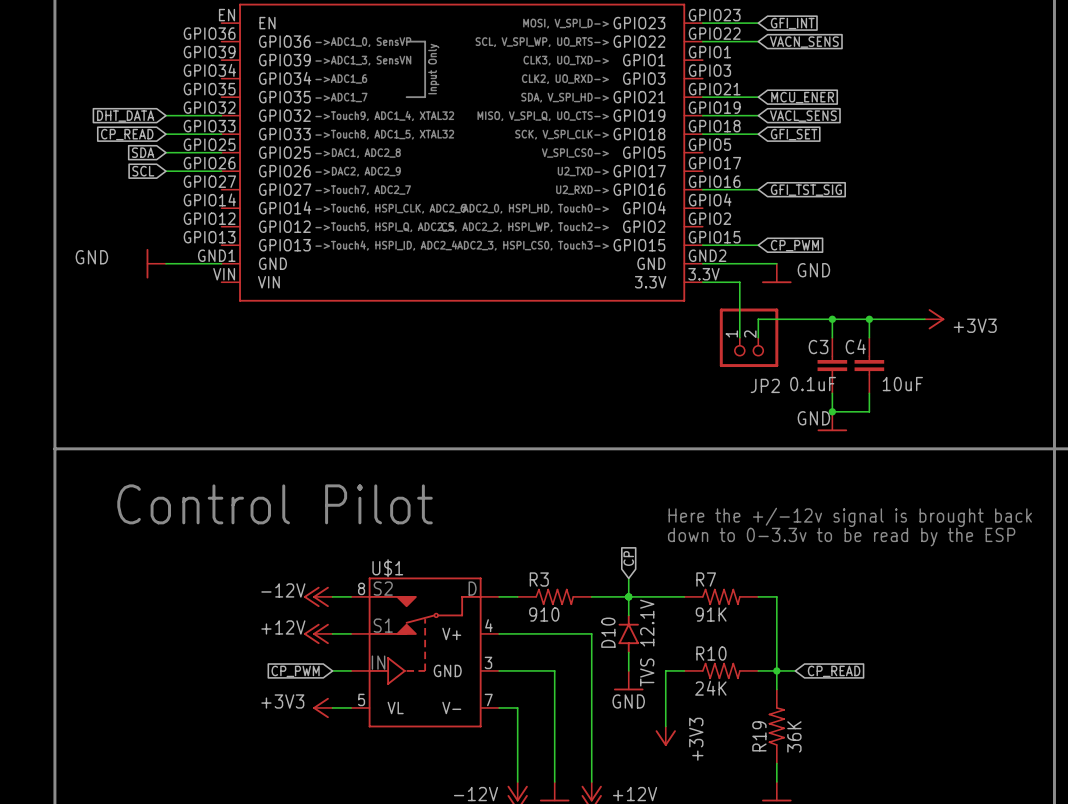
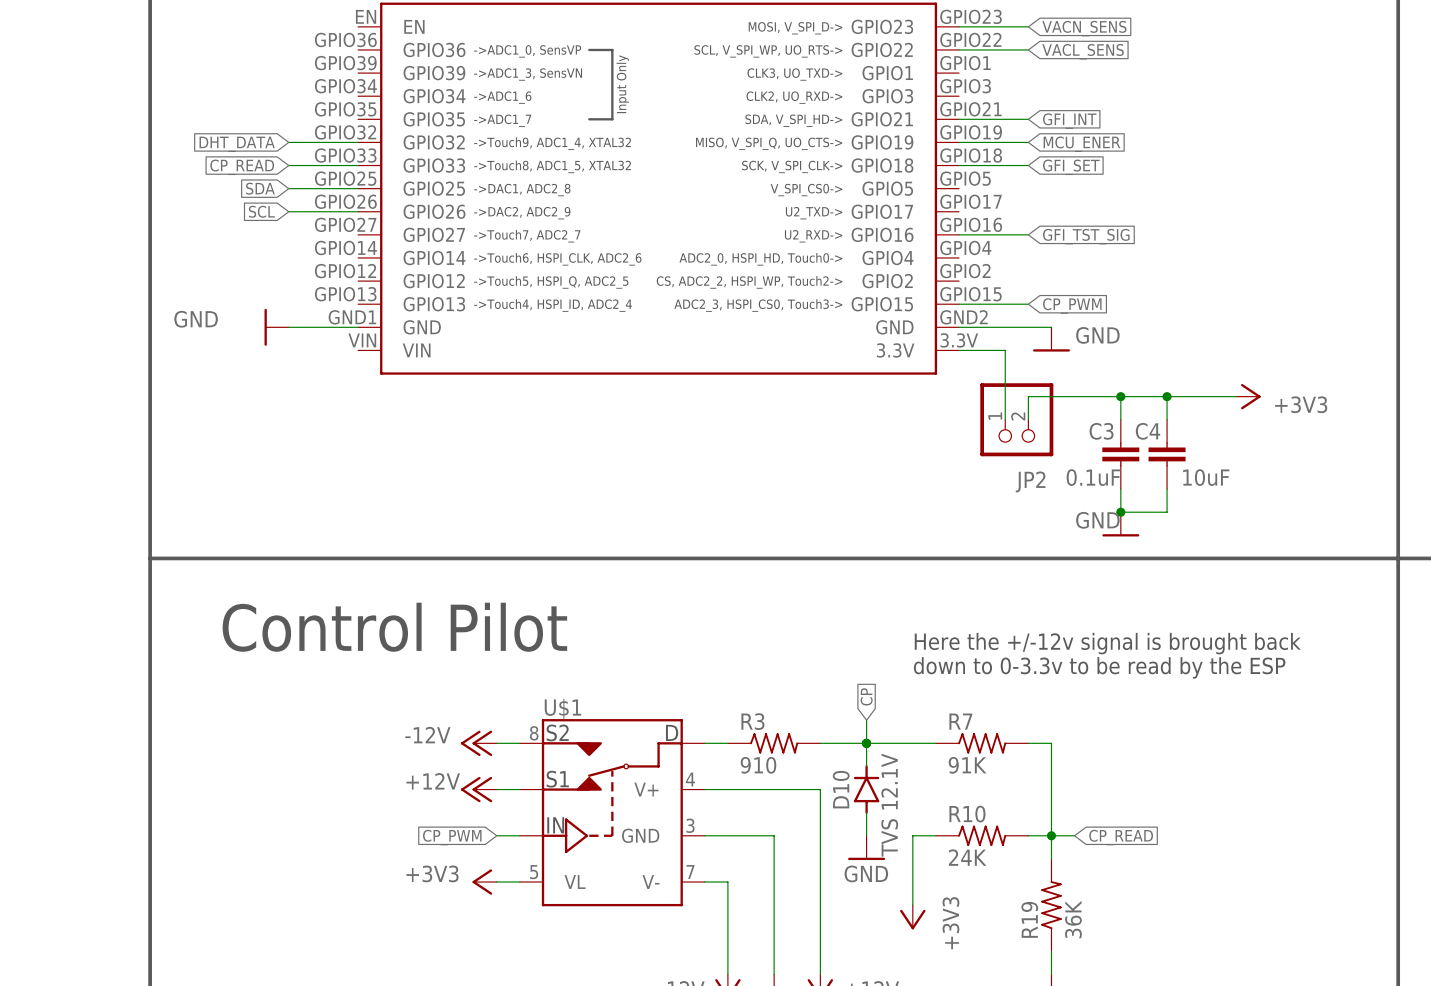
global label: GFI_INT (792, 23) -> VACN_SENS (1084, 28)
global label: VACN_SENS (804, 42) -> VACL_SENS (1083, 51)
global label: MCU_ENER (802, 97) -> GFI_INT (1069, 121)
global label: VACL_SENS (803, 116) -> MCU_ENER (1081, 144)

